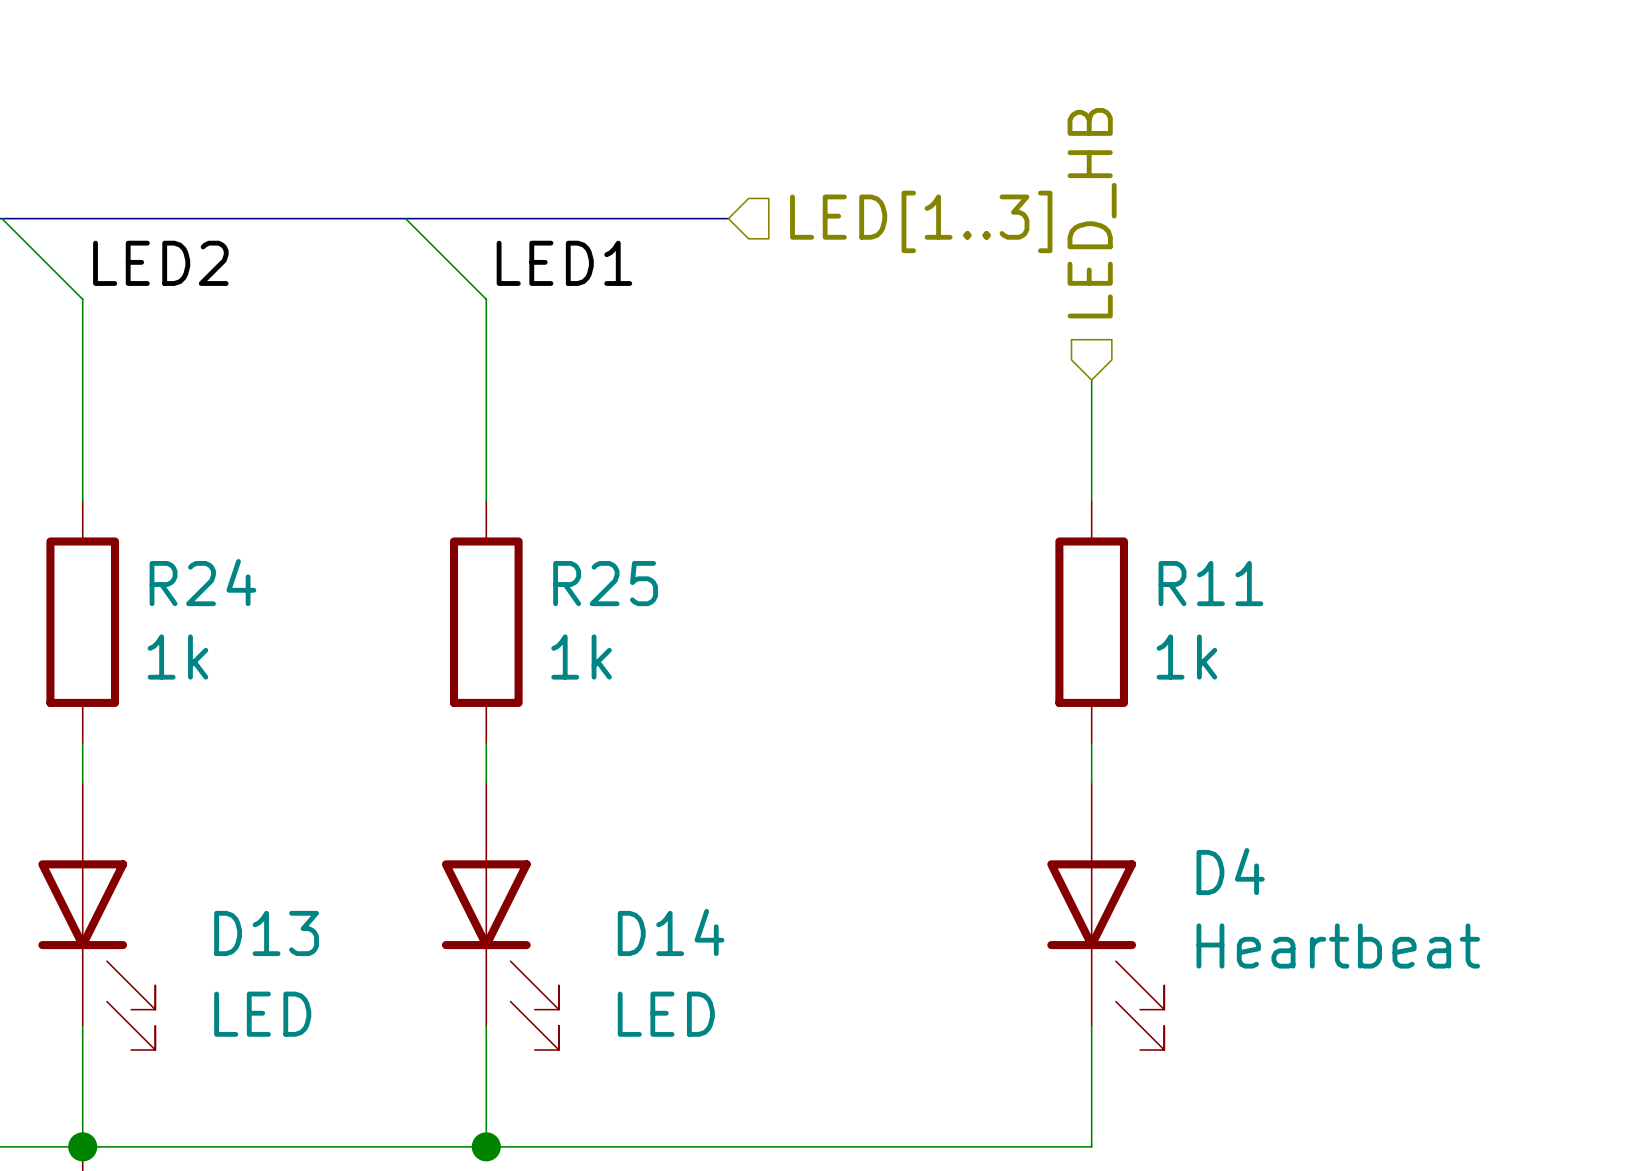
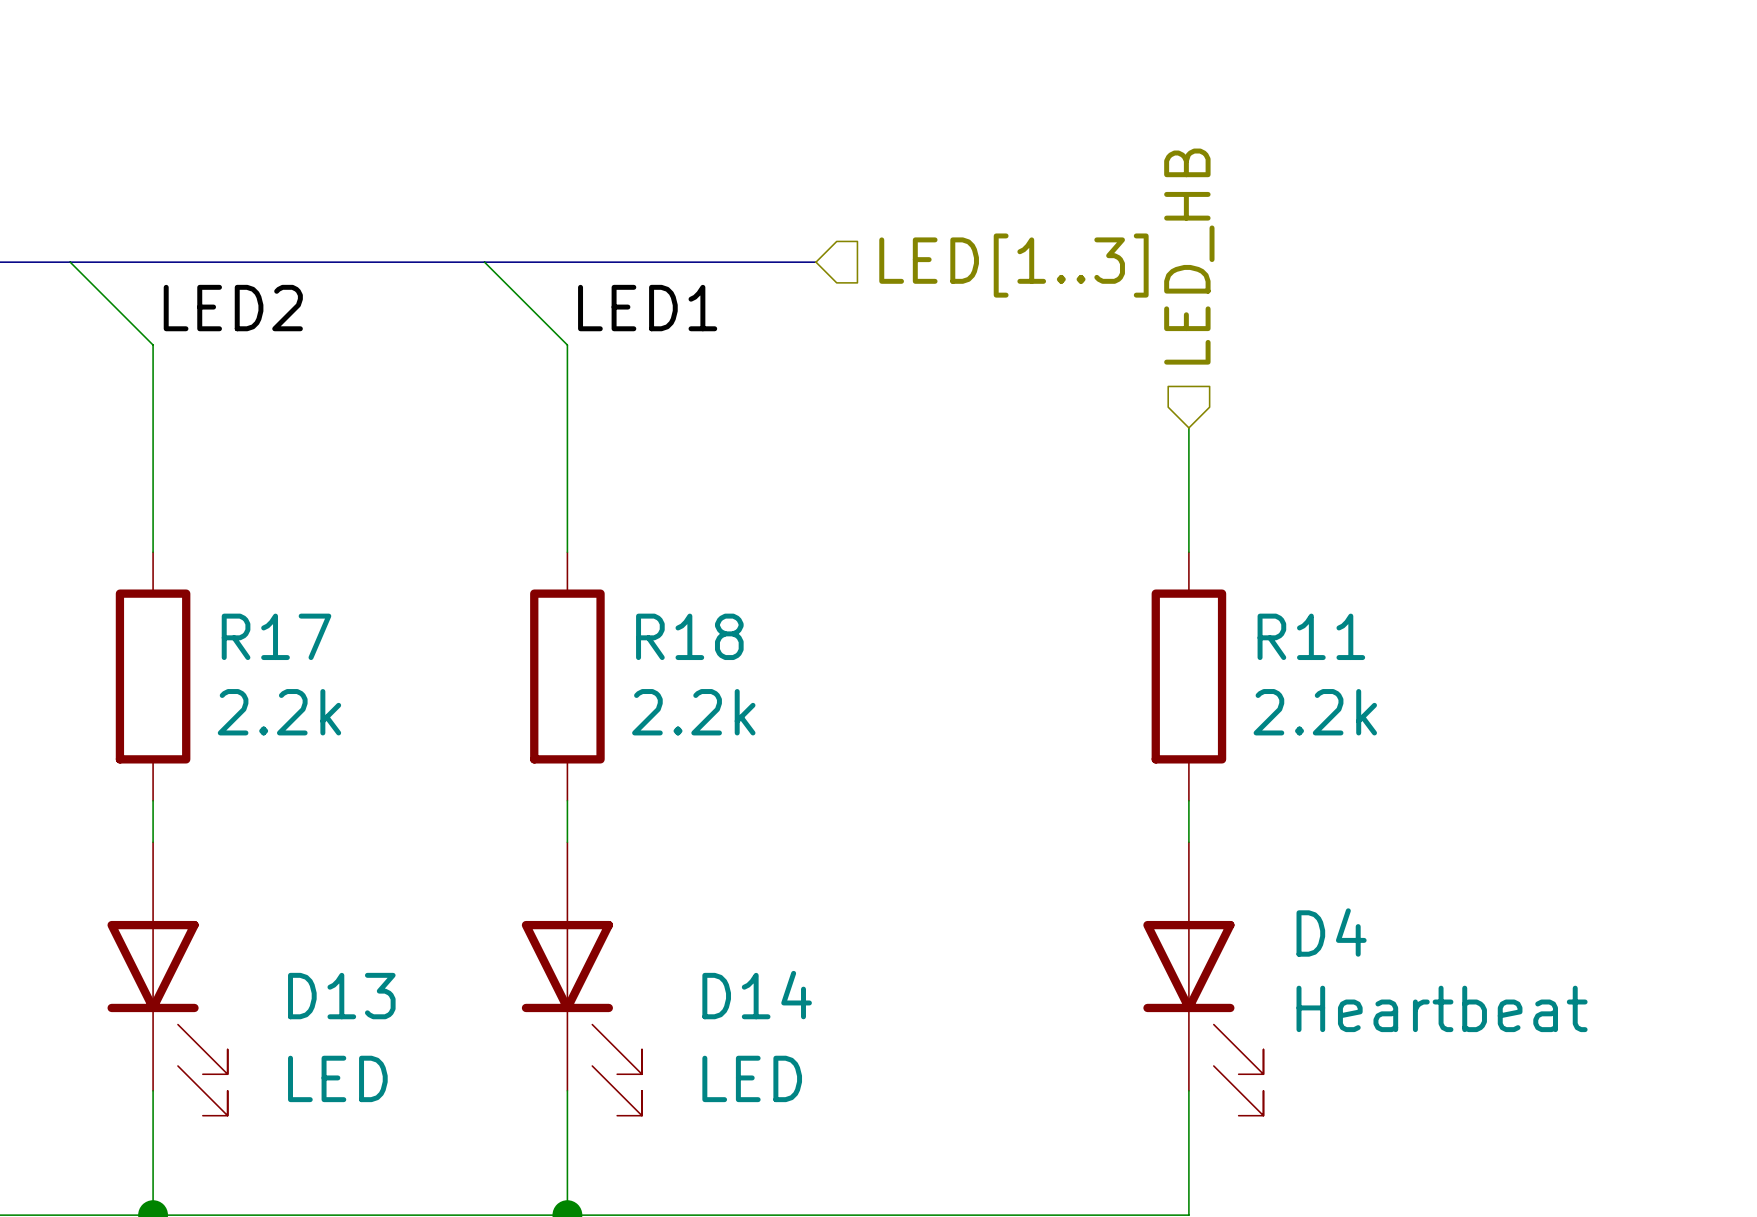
R24 name: R24 (202, 582) -> R17 (276, 636)
R25 name: R25 (605, 583) -> R18 (689, 636)
R24 value: 1k (177, 657) -> 2.2k (279, 712)
R25 value: 1k (581, 657) -> 2.2k (693, 712)
R11 value: 1k (1186, 657) -> 2.2k (1315, 712)

